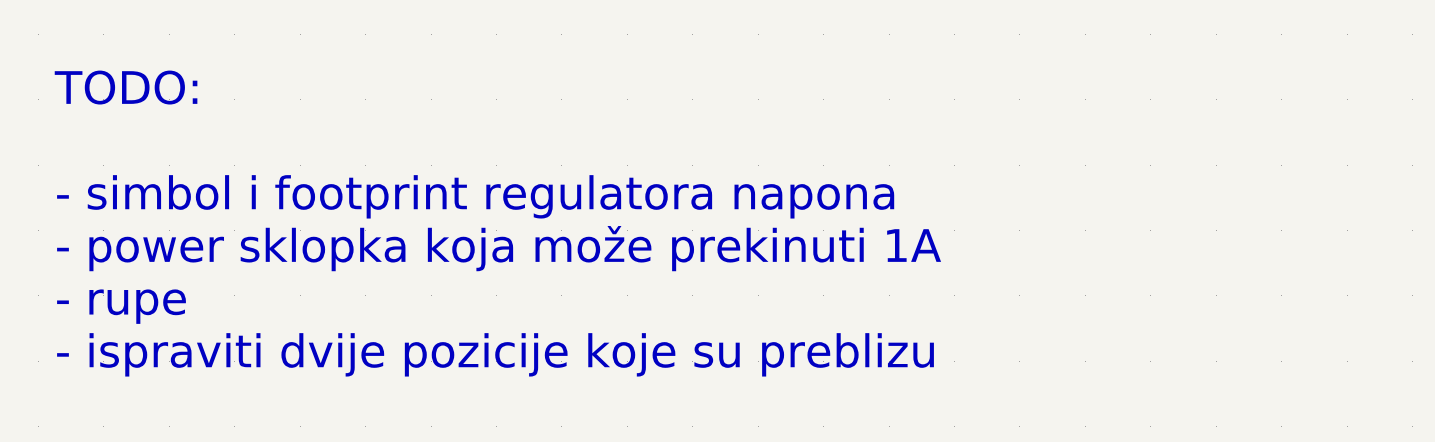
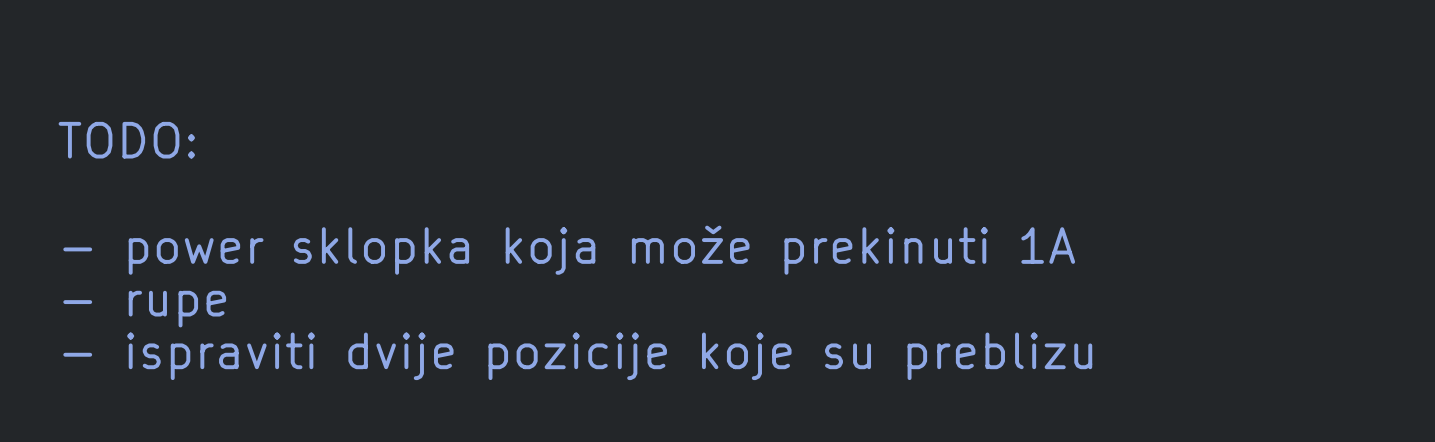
text position: TODO: (126, 87) -> TODO: (126, 140)
text: - simbol i footprint regulatora napona (475, 196) -> none

